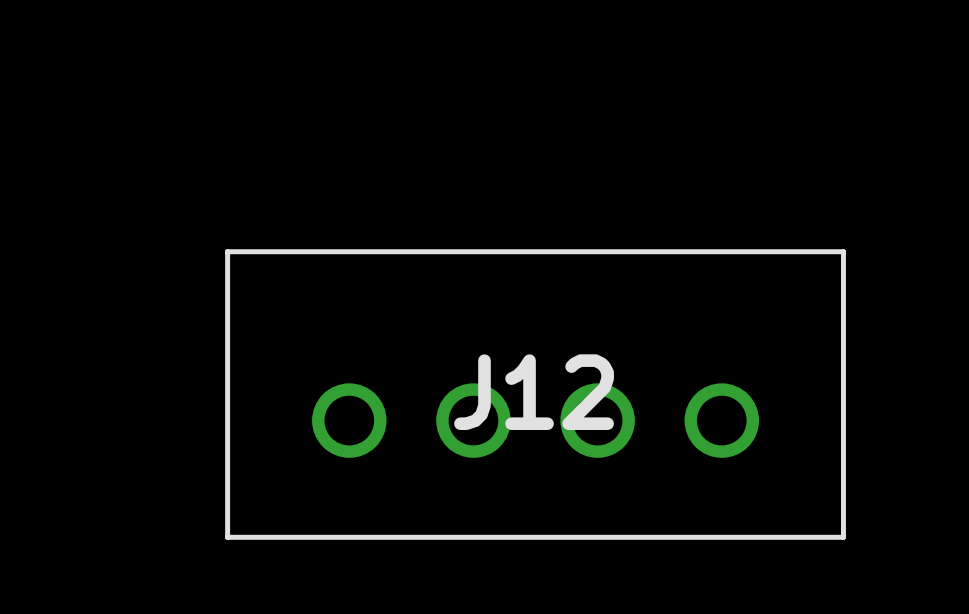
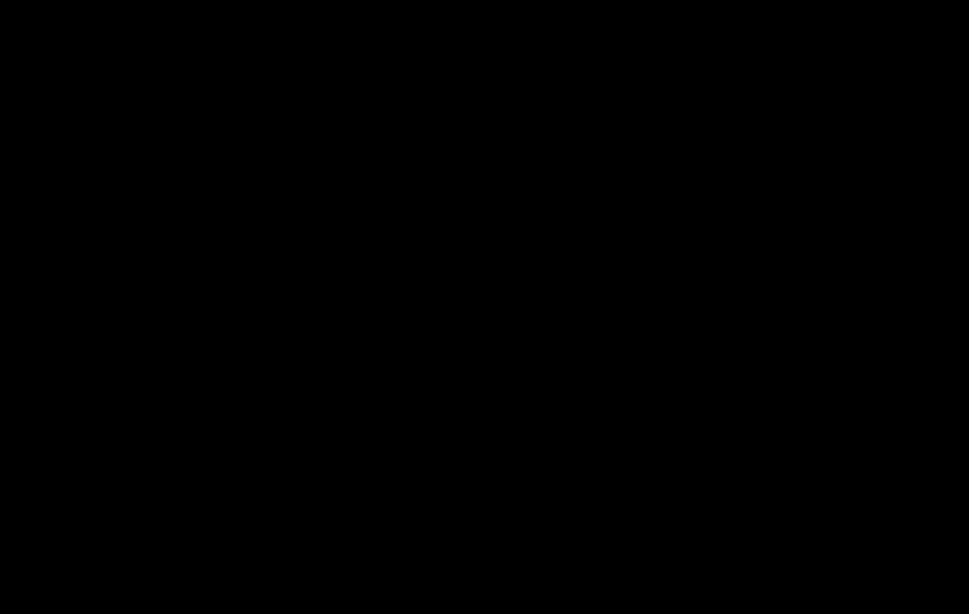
J12: (535, 394) -> none

